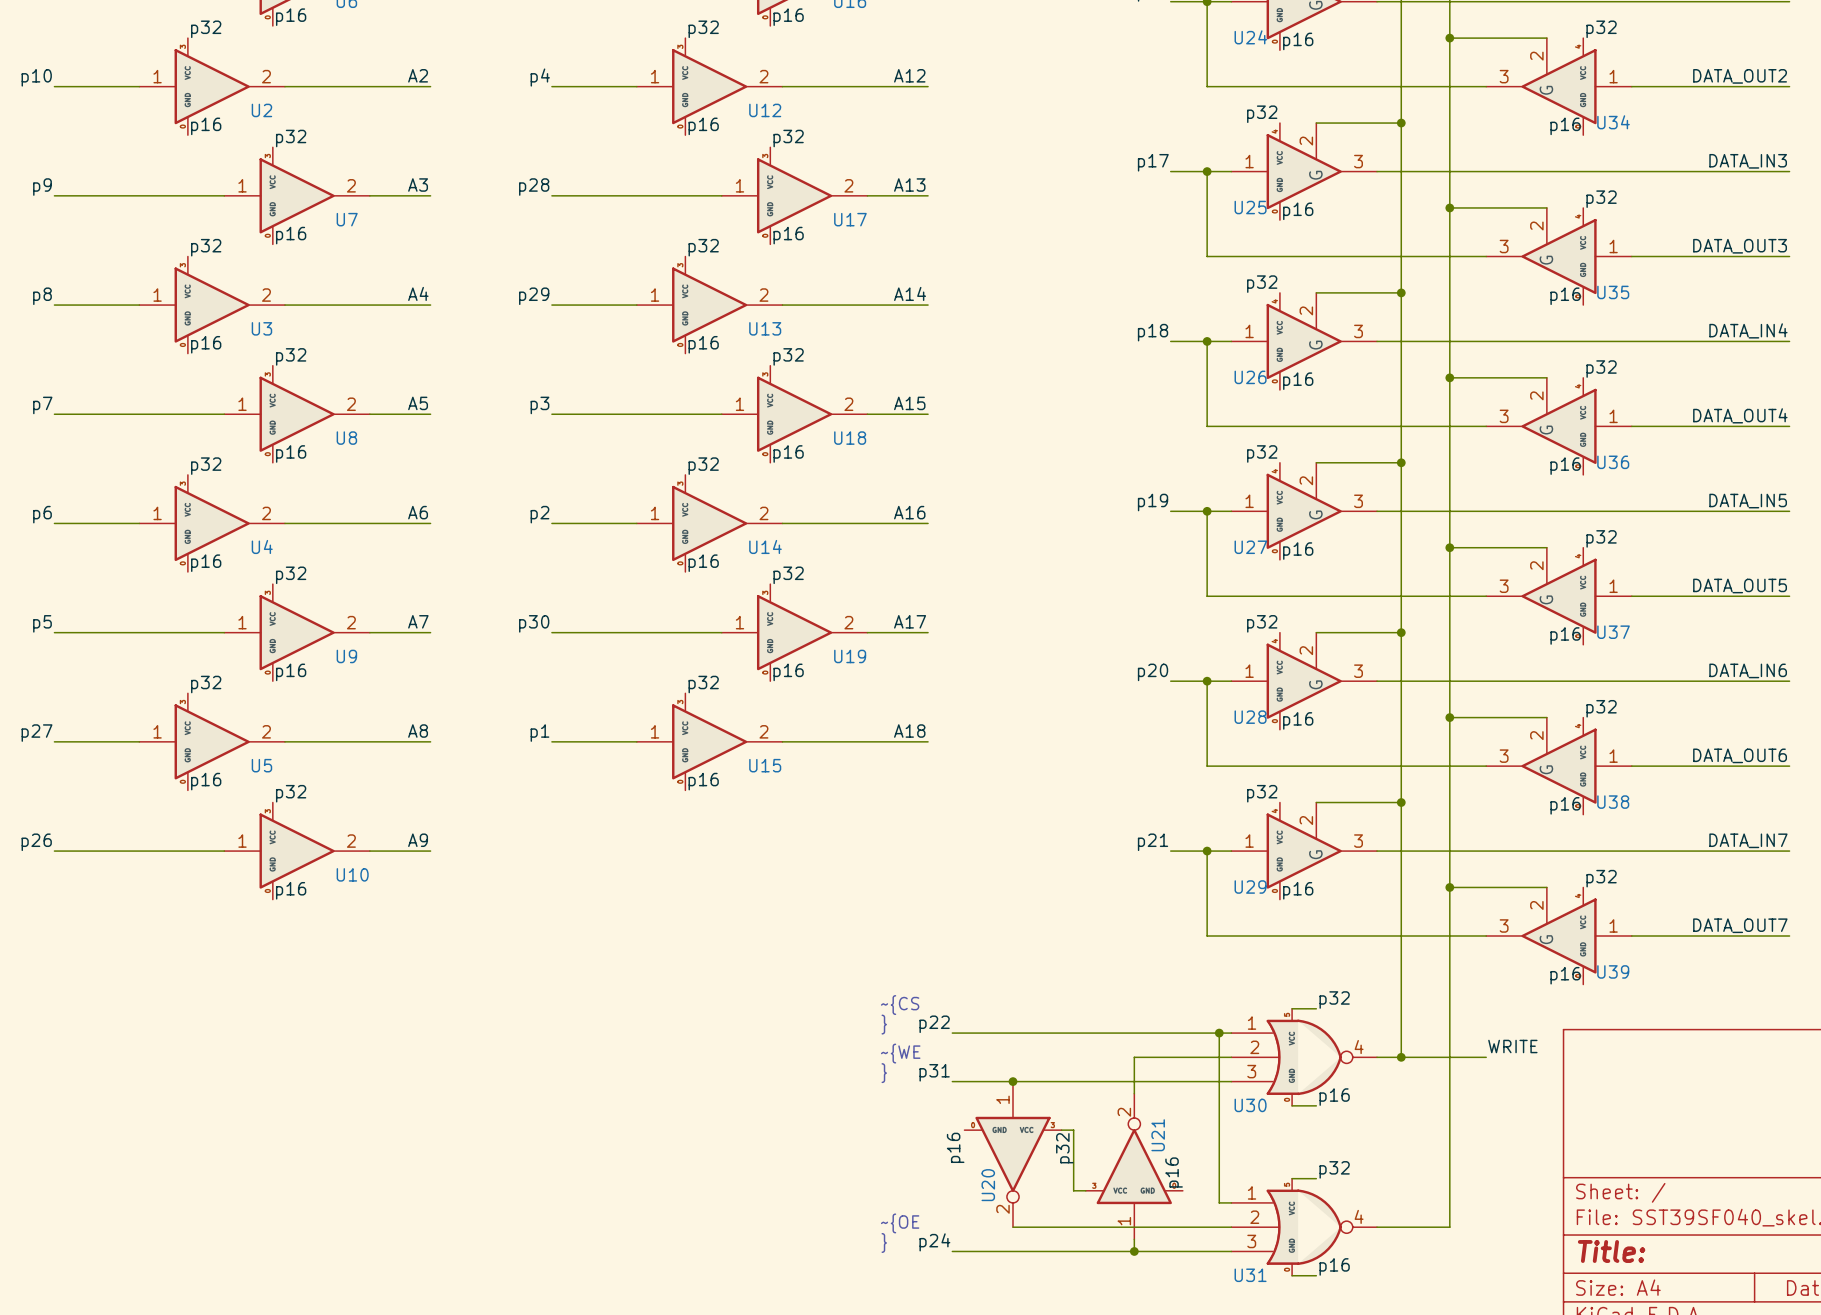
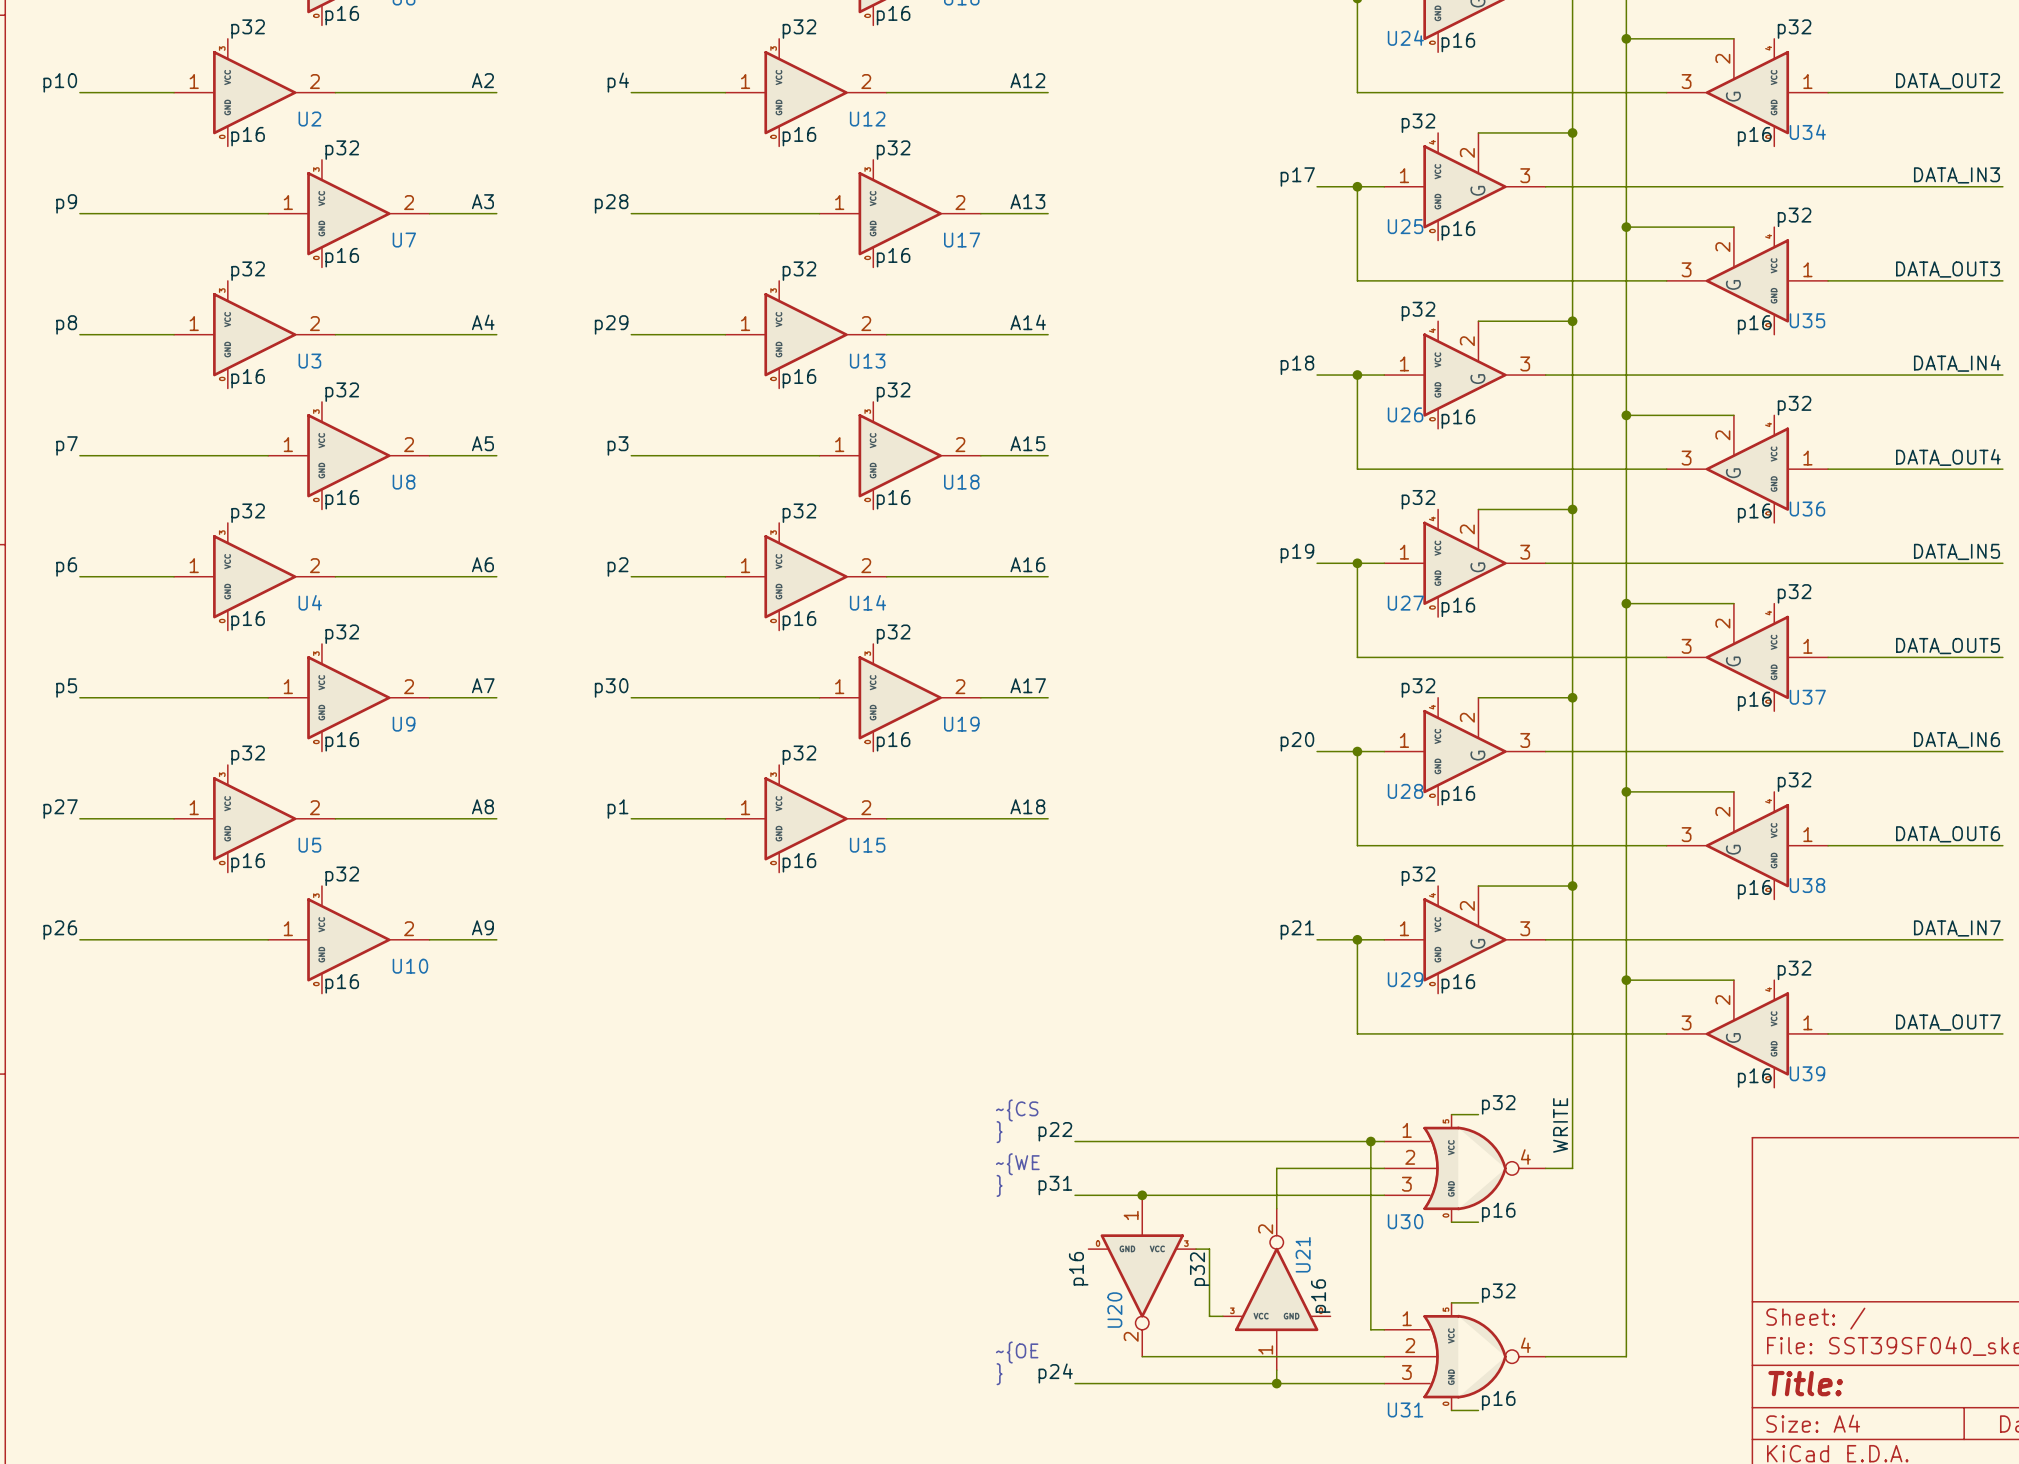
label rotation: 0° (1512, 1046) -> 90° counterclockwise (1560, 1125)
label position: WRITE (1512, 1046) -> WRITE (1560, 1125)
wire: (1401, 1057) (1486, 1057) -> none
junction: (1401, 1057) -> none

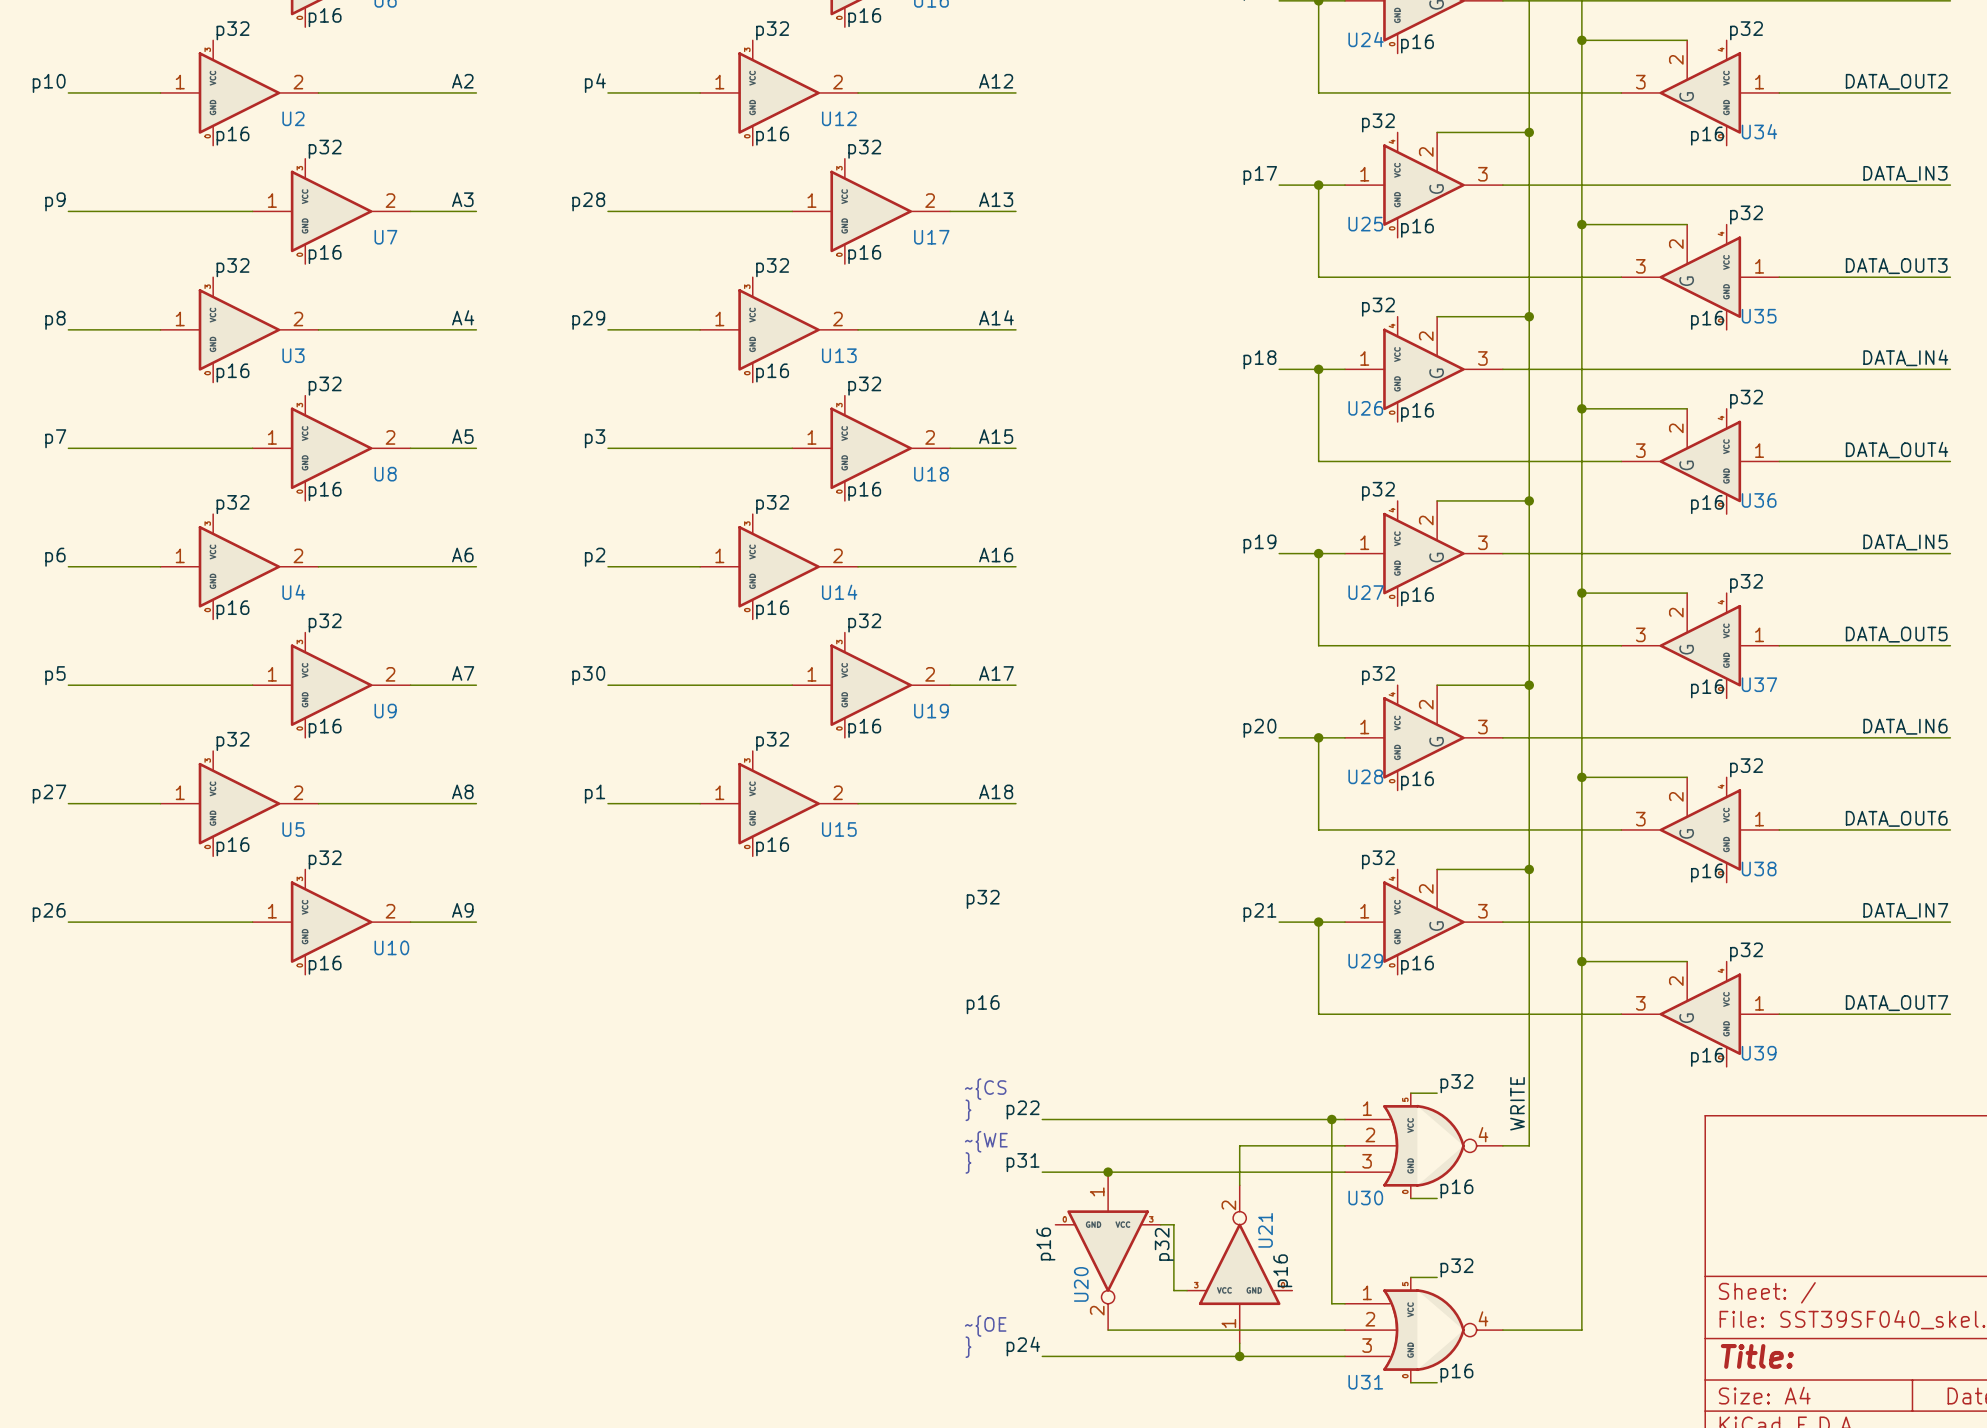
label: none -> p32 (983, 899)
label: none -> p16 (983, 1004)

